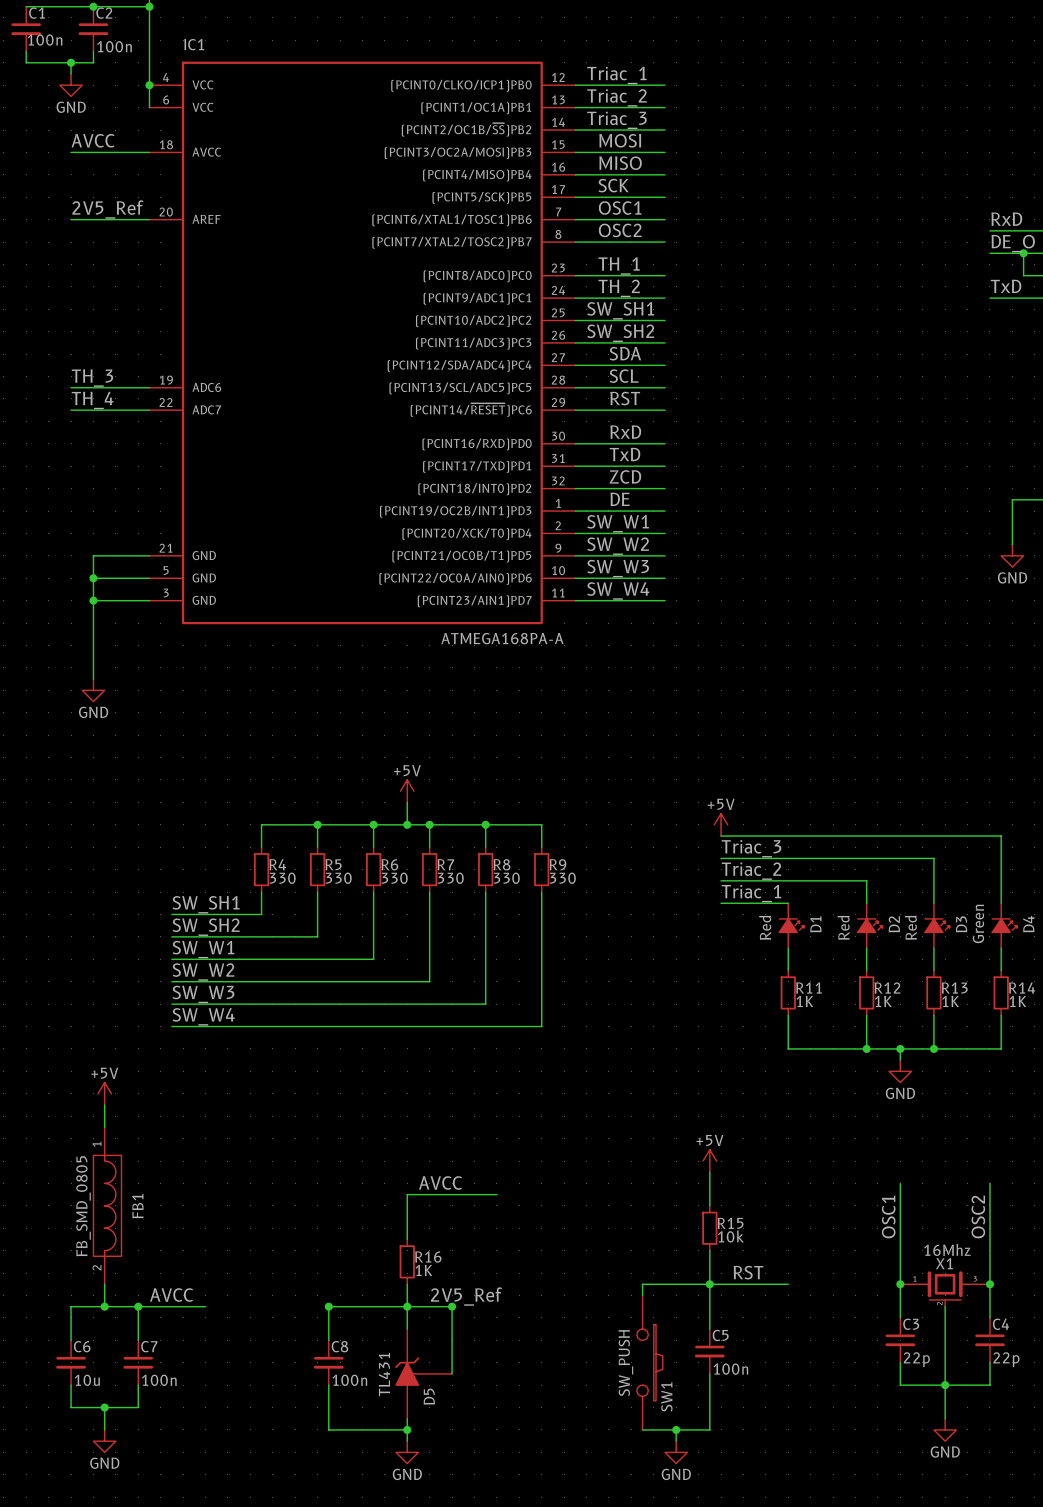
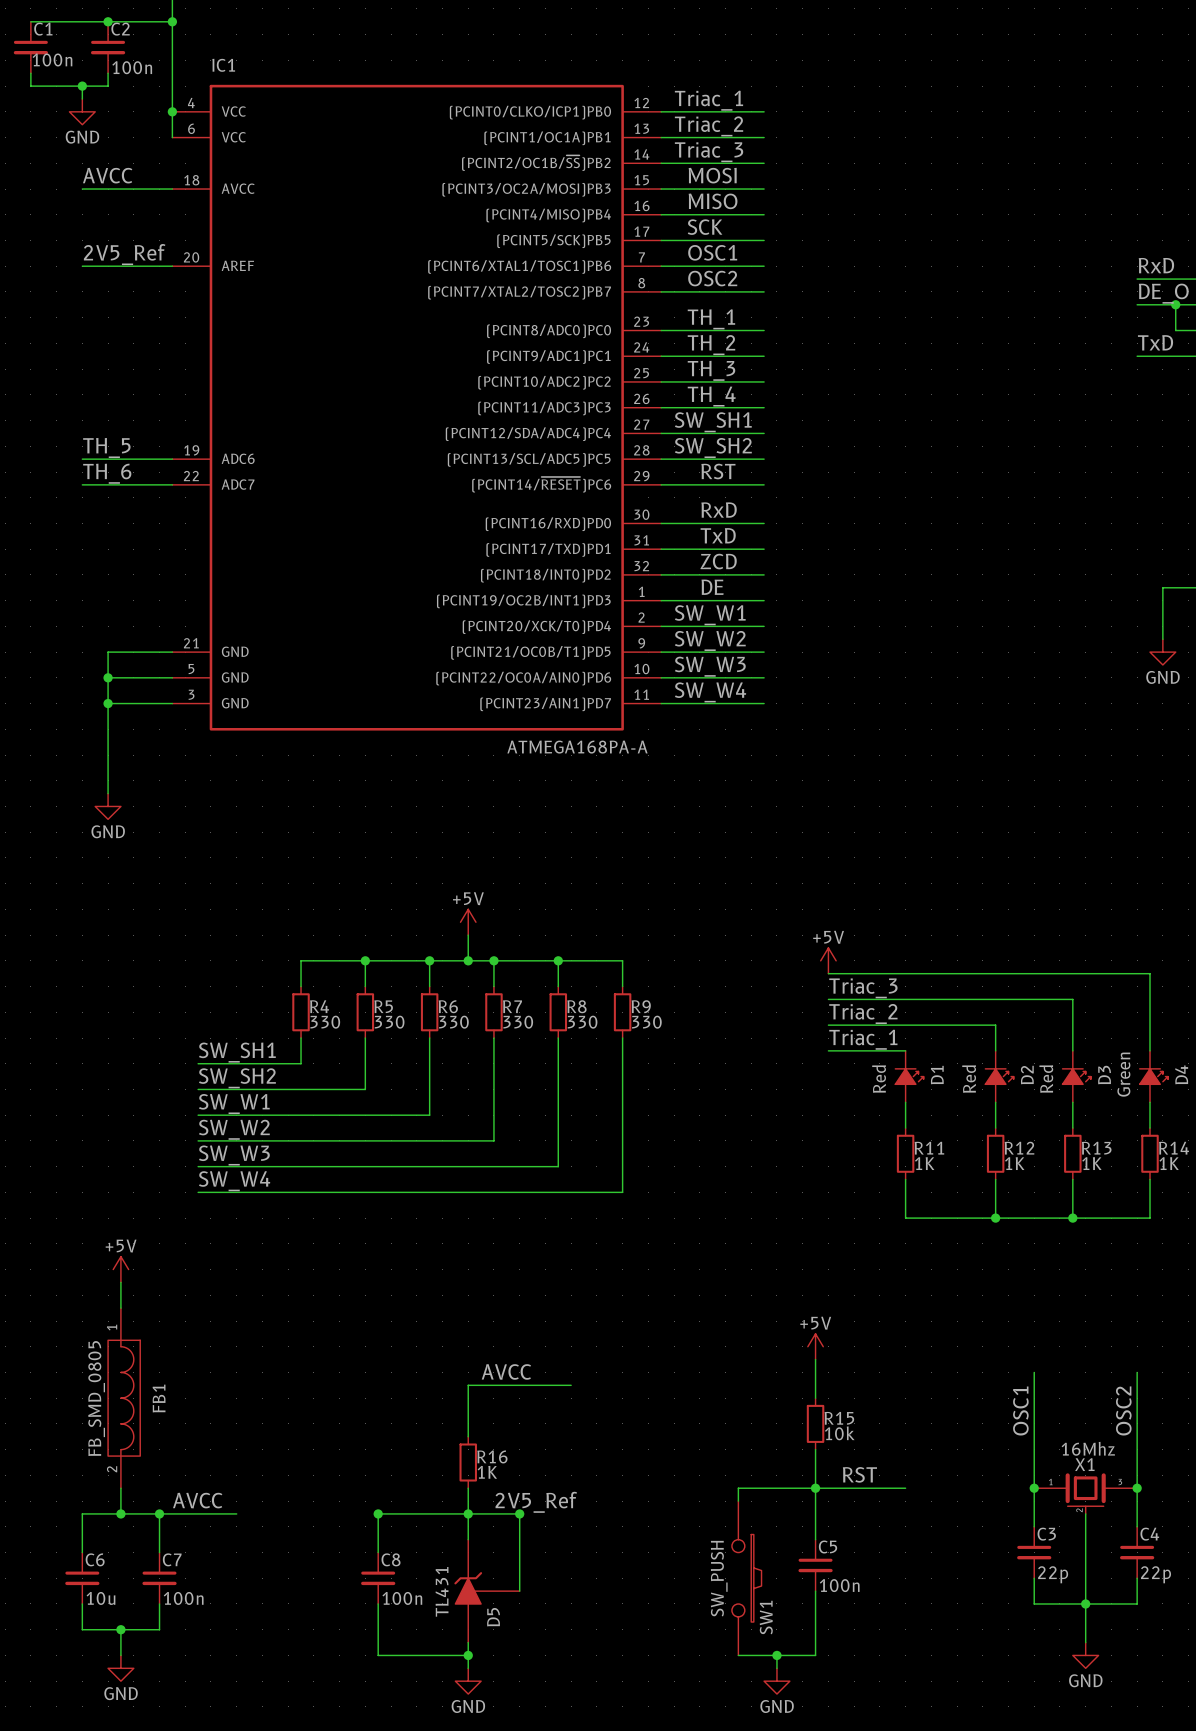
label: none -> TH_3 (711, 370)
label position: SW_SH1 (620, 310) -> SW_SH1 (713, 422)
label: none -> TH_4 (711, 396)
label position: SW_SH2 (620, 333) -> SW_SH2 (713, 447)
label: SDA (625, 353) -> none
label: SCL (624, 376) -> none
label: TH_3 (92, 378) -> TH_5 (106, 447)
label: TH_4 (92, 400) -> TH_6 (107, 473)
wire: (900, 1048) (900, 1060) -> none
junction: (900, 1048) -> none
power symbol: GND (900, 1071) -> none

